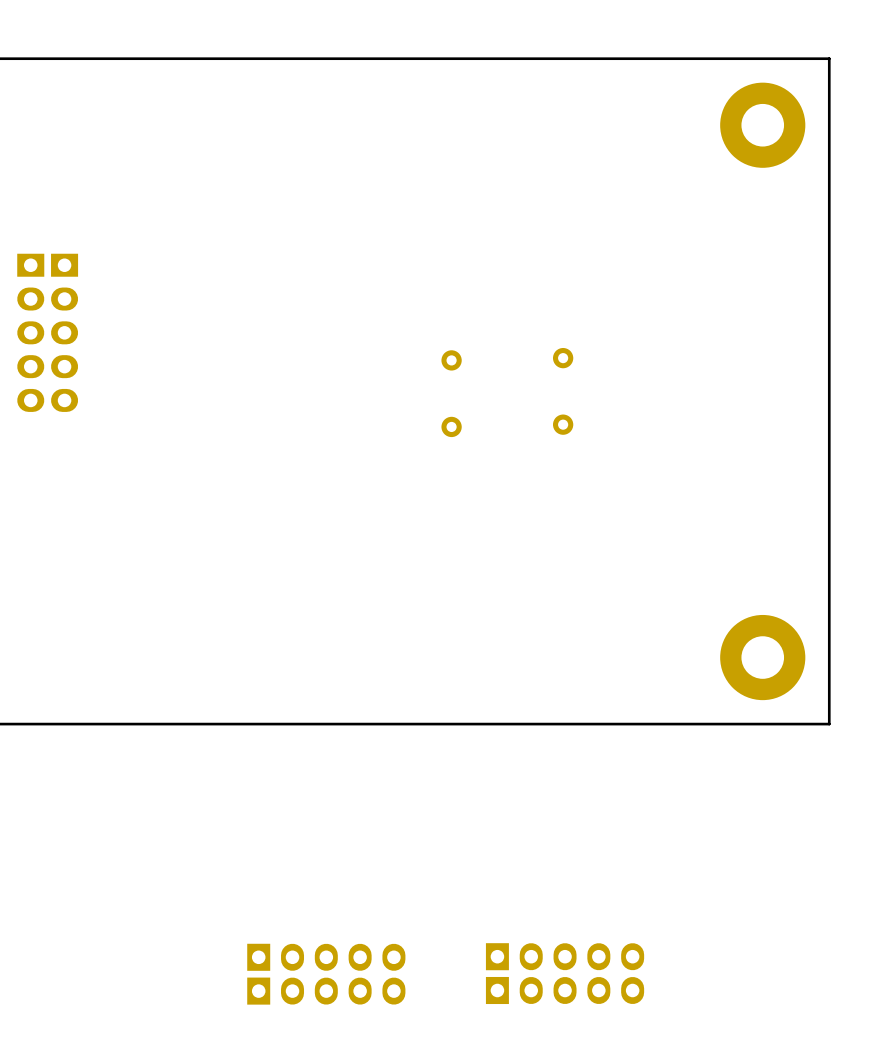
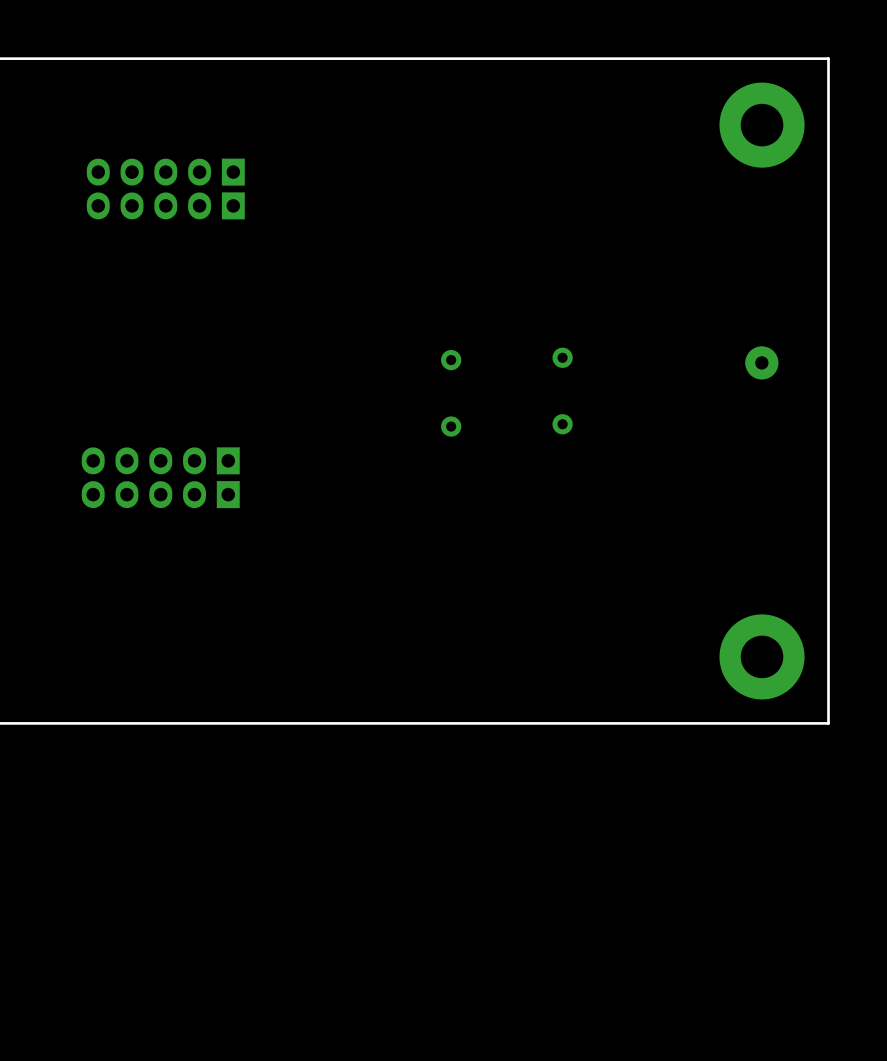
part: none -> (165, 172)
part: none -> (165, 205)
part: (30, 332) -> none
part: (64, 332) -> none
part: none -> (761, 362)
part: none -> (160, 460)
part: none -> (160, 494)
part: (565, 956) -> none
part: (326, 957) -> none
part: (565, 990) -> none
part: (326, 991) -> none

